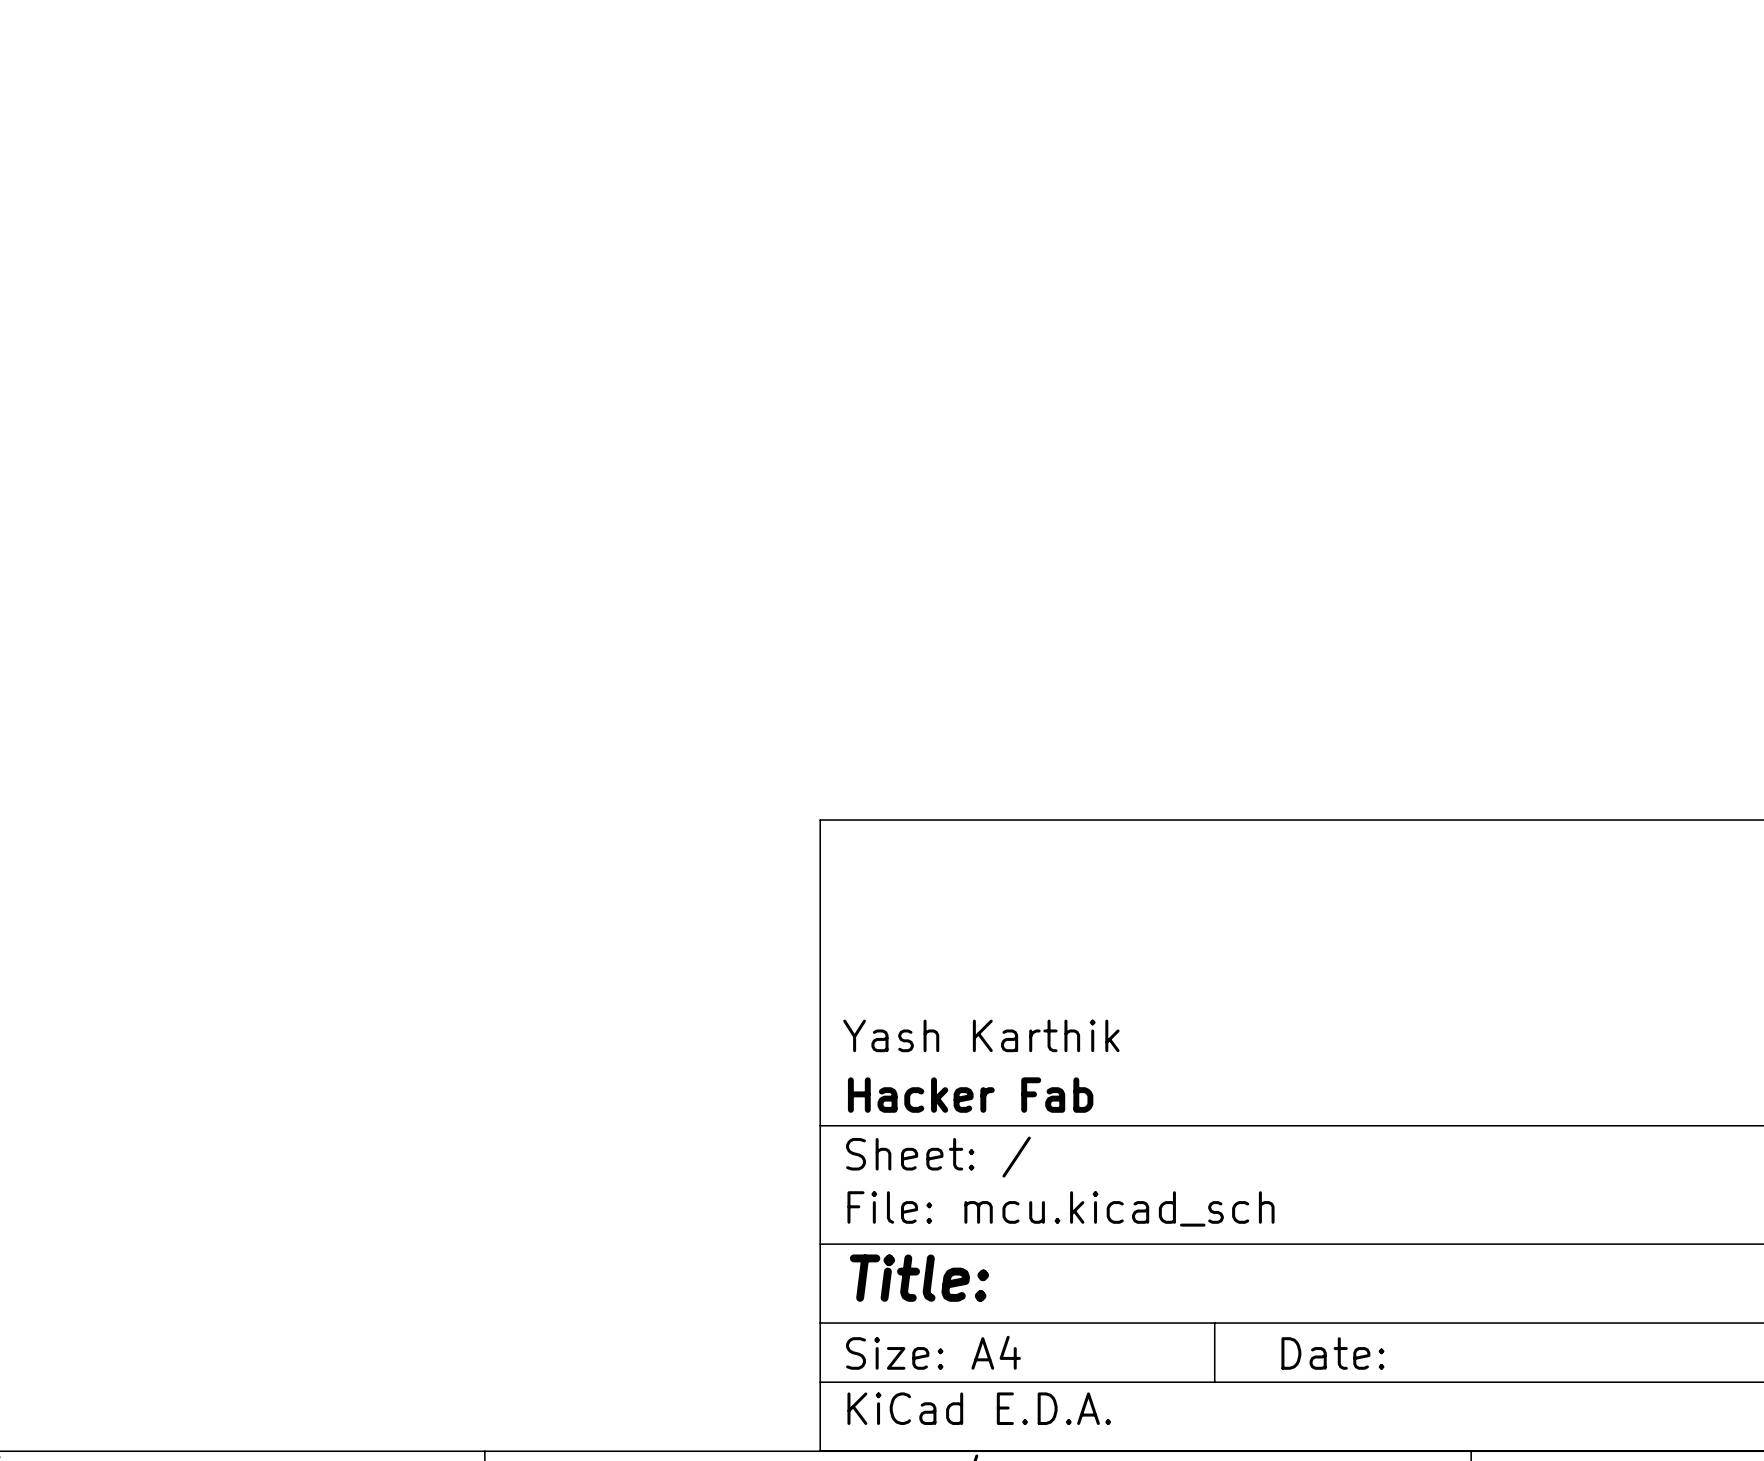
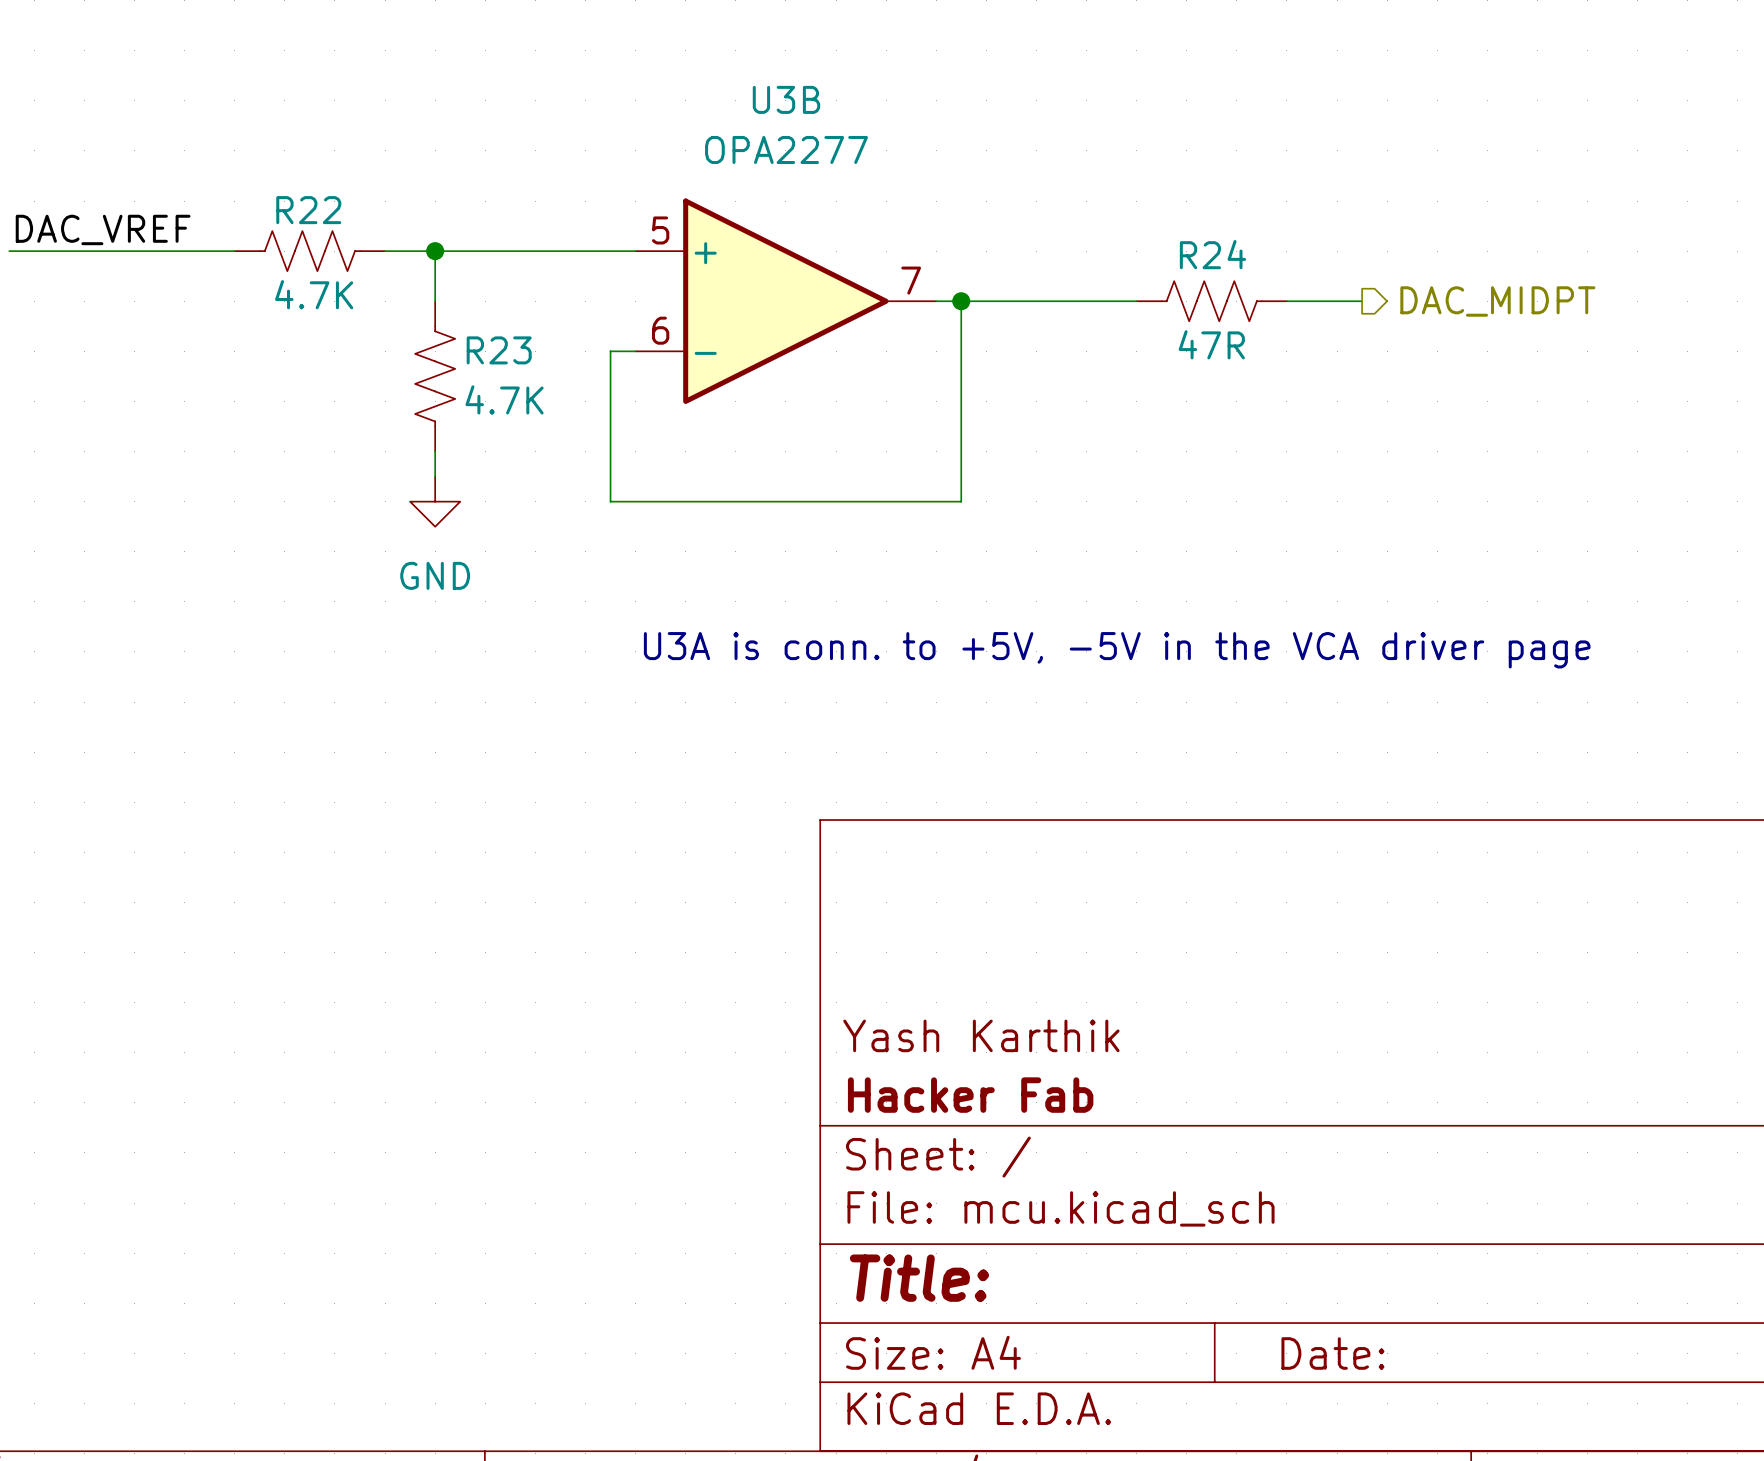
label: none -> DAC_VREF (103, 229)
wire: none -> (9, 251) (234, 251)
R22: none -> 4.7K (309, 251)
wire: none -> (385, 251) (635, 251)
wire: none -> (435, 251) (435, 301)
junction: none -> (435, 251)
U3B: none -> OPA2277 (785, 301)
wire: none -> (936, 301) (1136, 301)
wire: none -> (961, 301) (961, 501) (610, 501) (610, 351) (635, 351)
junction: none -> (961, 301)
R24: none -> 47R (1211, 301)
wire: none -> (1286, 301) (1362, 301)
hierarchical label: none -> DAC_MIDPT (1497, 301)
R23: none -> 4.7K (435, 376)
wire: none -> (435, 451) (435, 476)
power symbol: none -> GND (435, 501)
text: none -> U3A is conn. to +5V, -5V in the VCA driver page (1117, 650)

